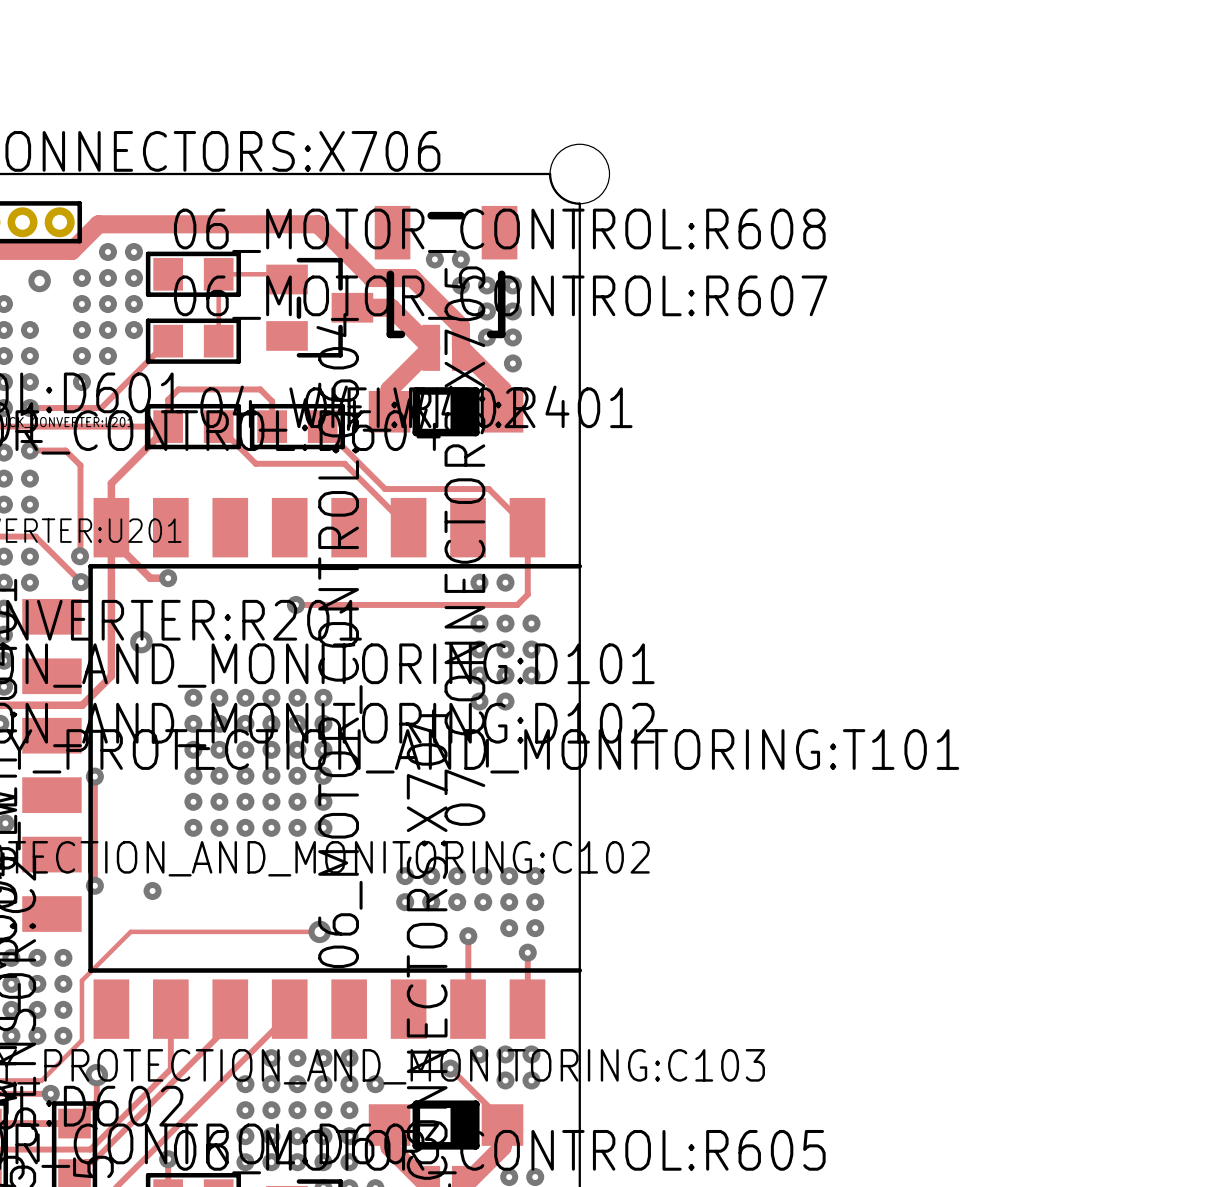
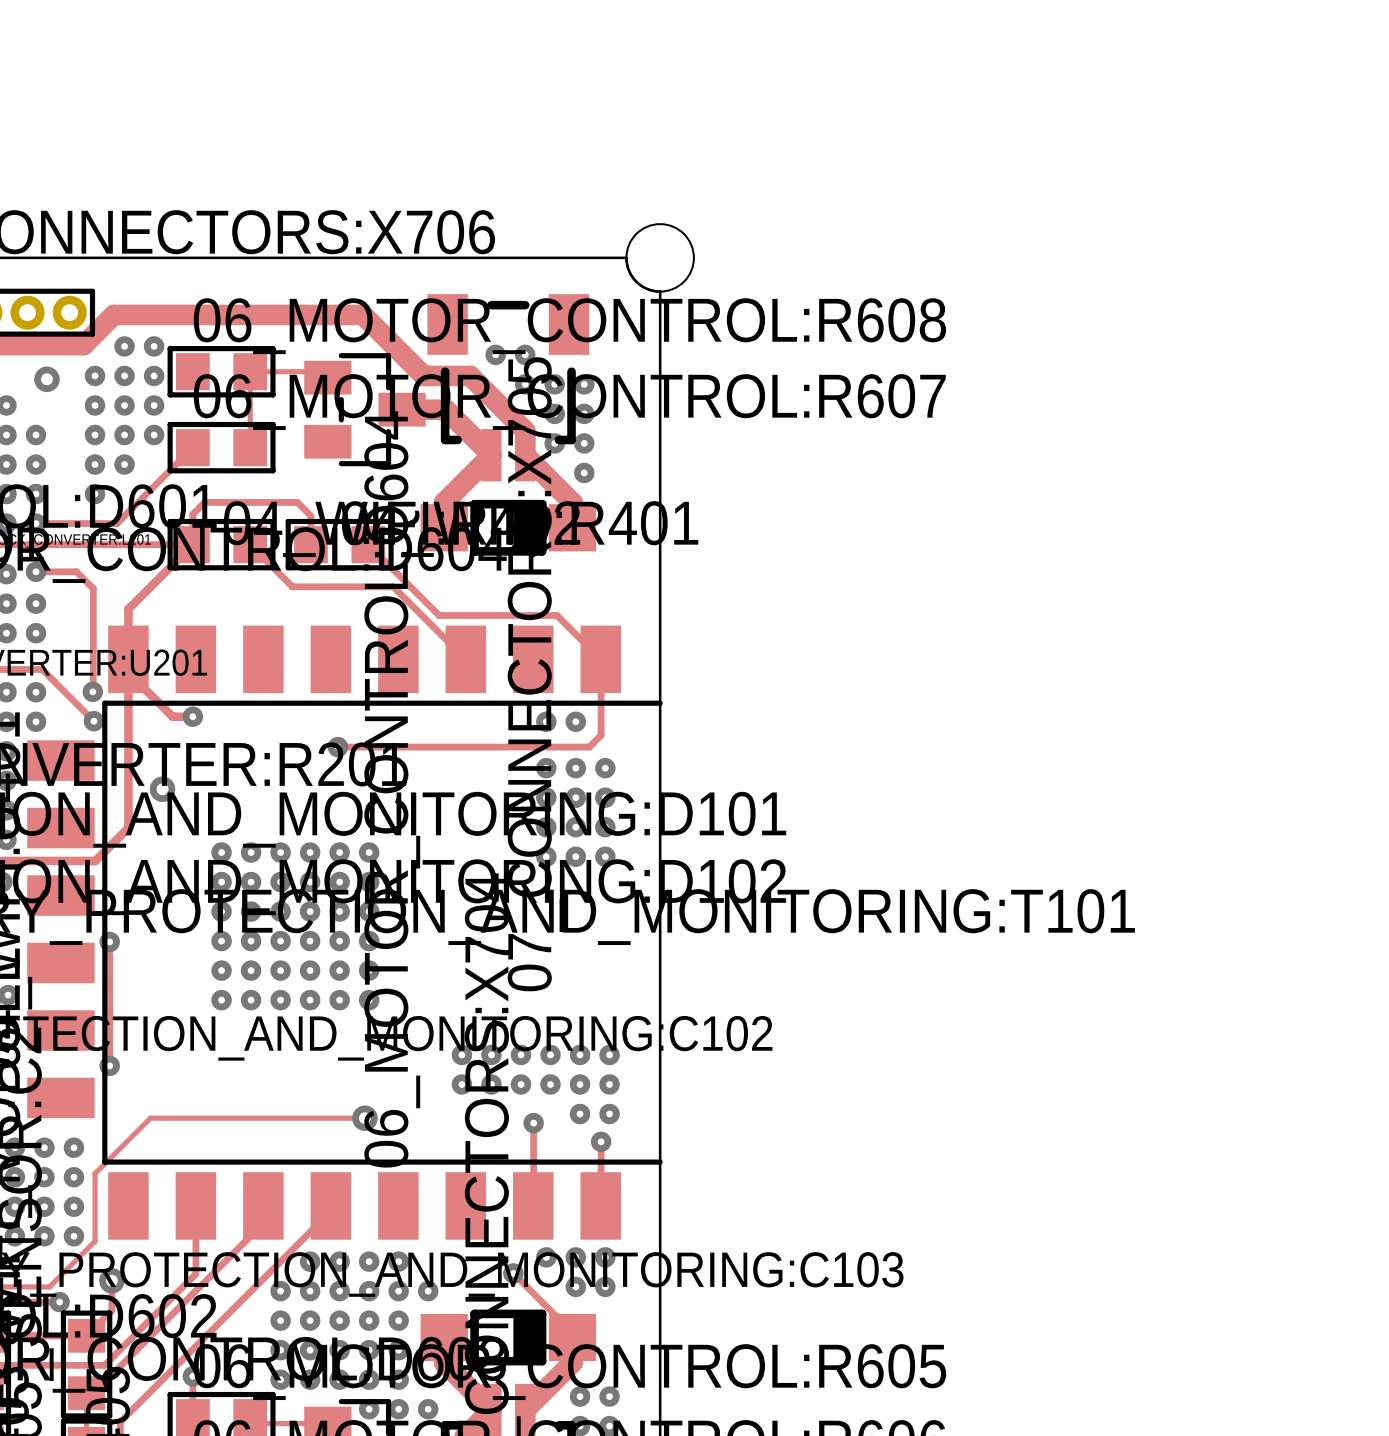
via: none -> (605, 856)
via: (152, 891) -> none

